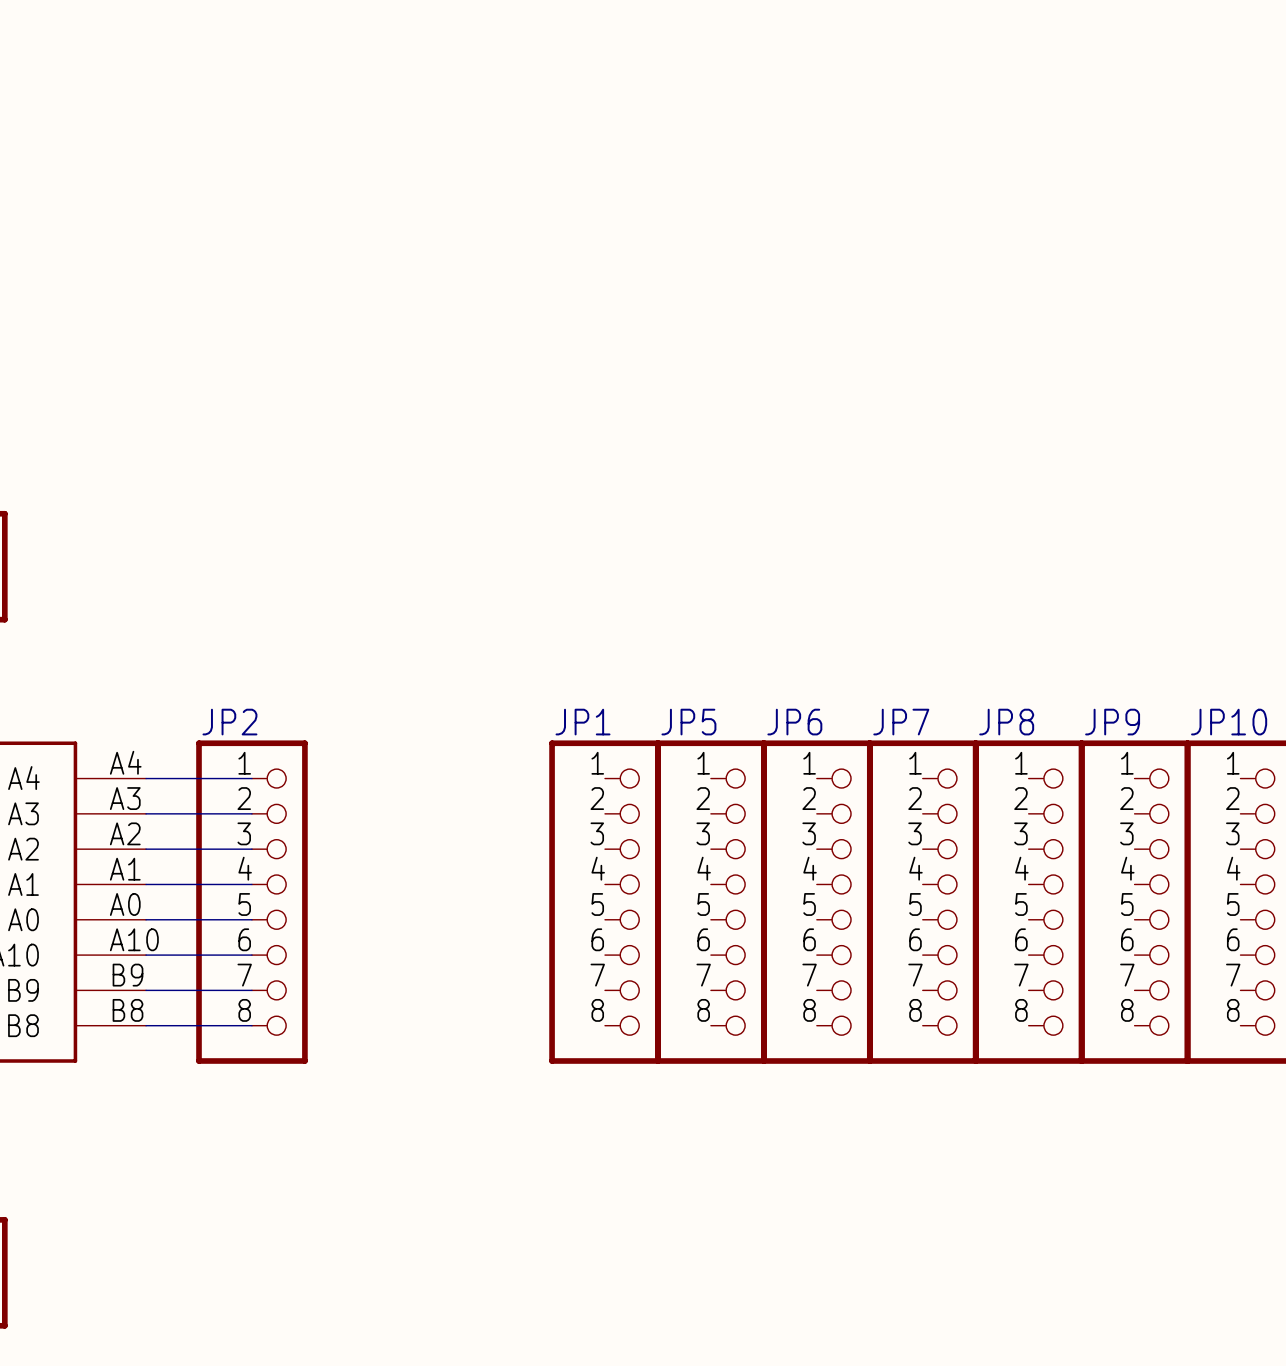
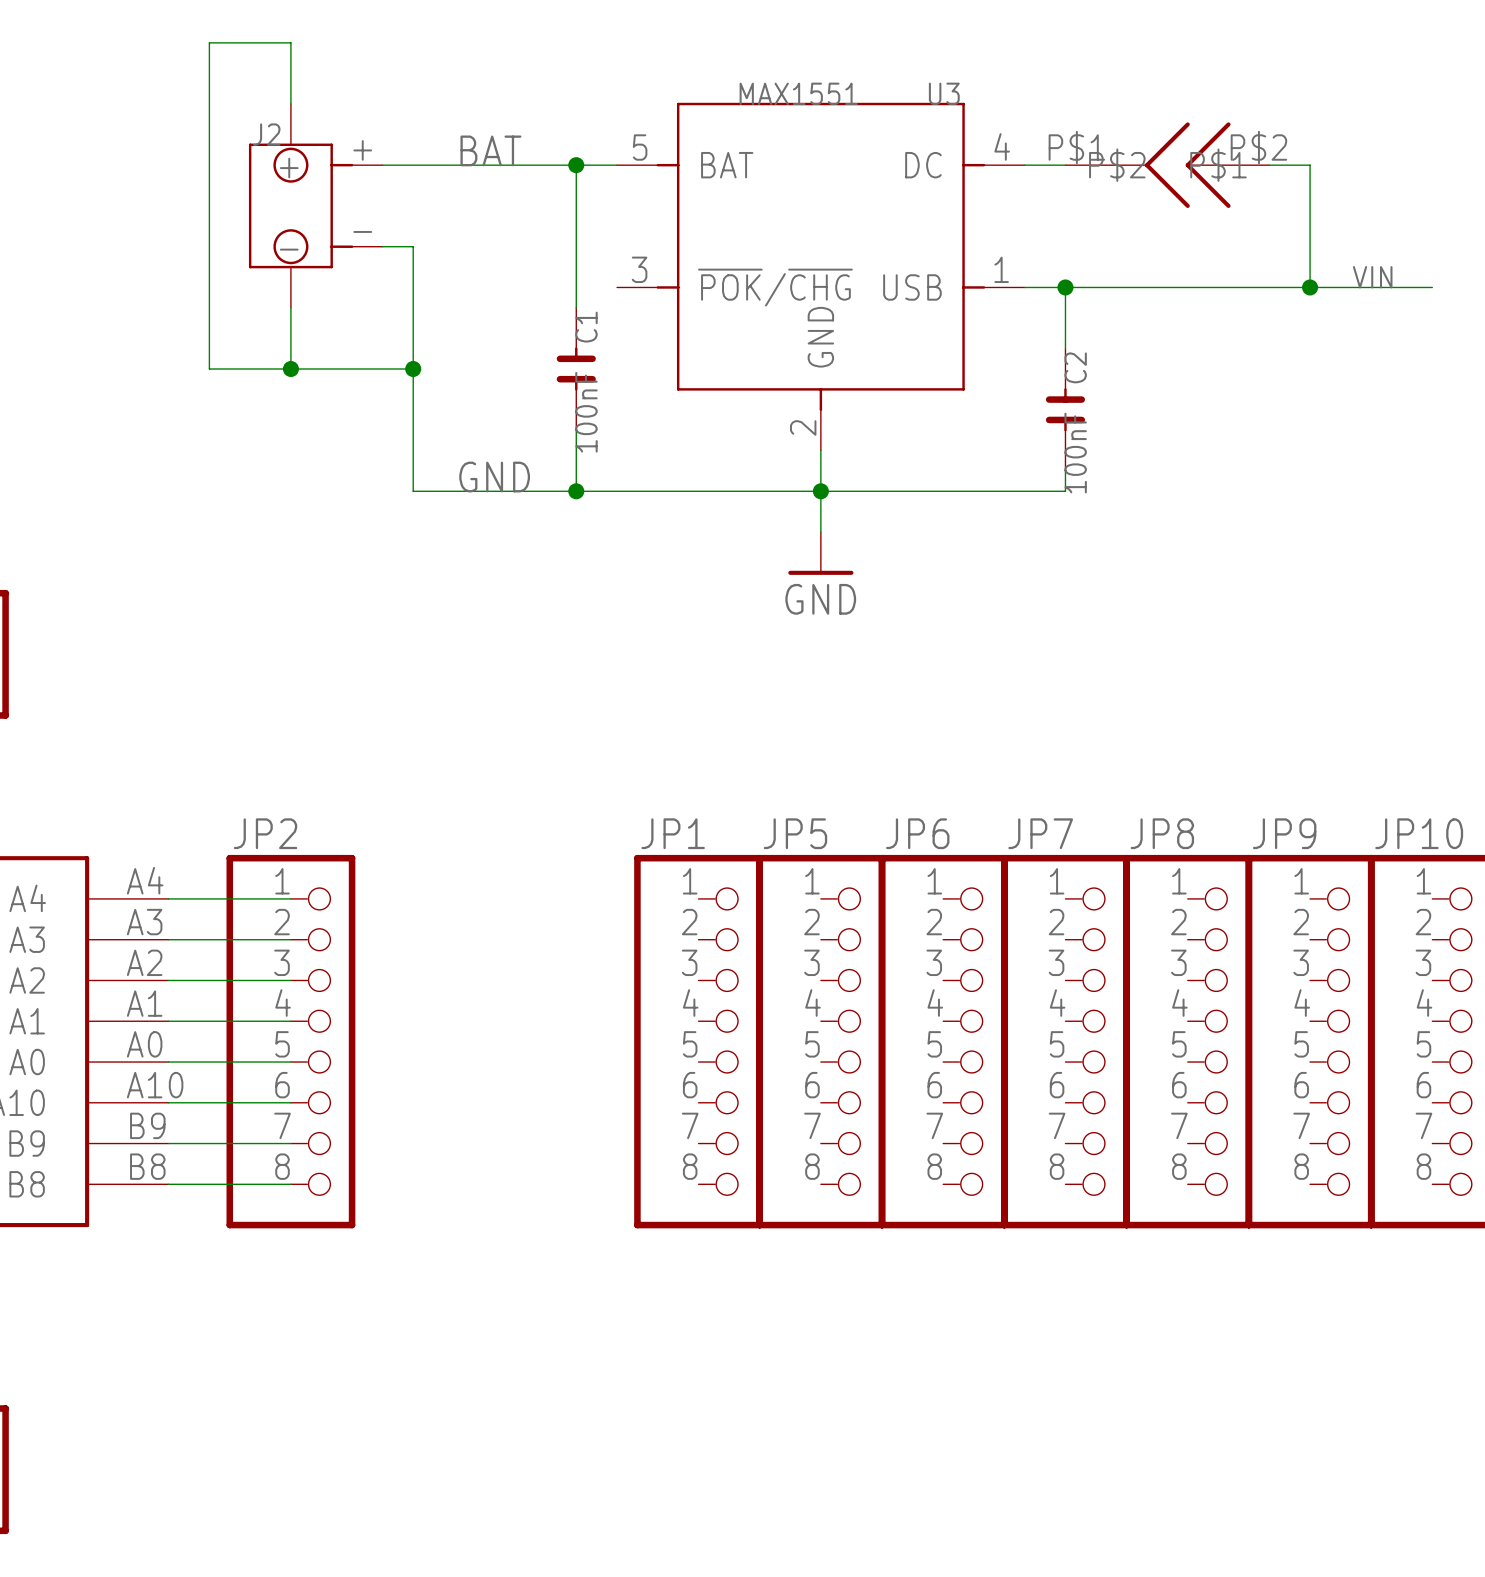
wire: none -> (290, 104) (290, 42) (209, 42) (209, 369) (413, 369)
label: none -> BAT (490, 150)
wire: none -> (382, 165) (617, 165)
wire: none -> (576, 165) (576, 307)
junction: none -> (576, 165)
wire: none -> (1024, 165) (1065, 165)
part: none -> (1167, 165)
wire: none -> (1269, 165) (1310, 165) (1310, 287)
J2: none -> (315, 205)
wire: none -> (382, 246) (413, 246) (413, 491) (1065, 491) (1065, 470)
U3: none -> MAX1551 (820, 276)
label: none -> VIN (1372, 277)
wire: none -> (1024, 287) (1432, 287)
wire: none -> (1065, 287) (1065, 348)
junction: none -> (1065, 287)
junction: none -> (1310, 287)
wire: none -> (290, 307) (290, 369)
junction: none -> (290, 369)
junction: none -> (413, 369)
C1: none -> 100nF (576, 369)
C2: none -> 100nF (1065, 409)
wire: none -> (576, 430) (576, 491)
wire: none -> (820, 450) (820, 532)
label: none -> GND (494, 477)
junction: none -> (576, 491)
junction: none -> (820, 491)
power symbol: none -> GND (820, 553)

